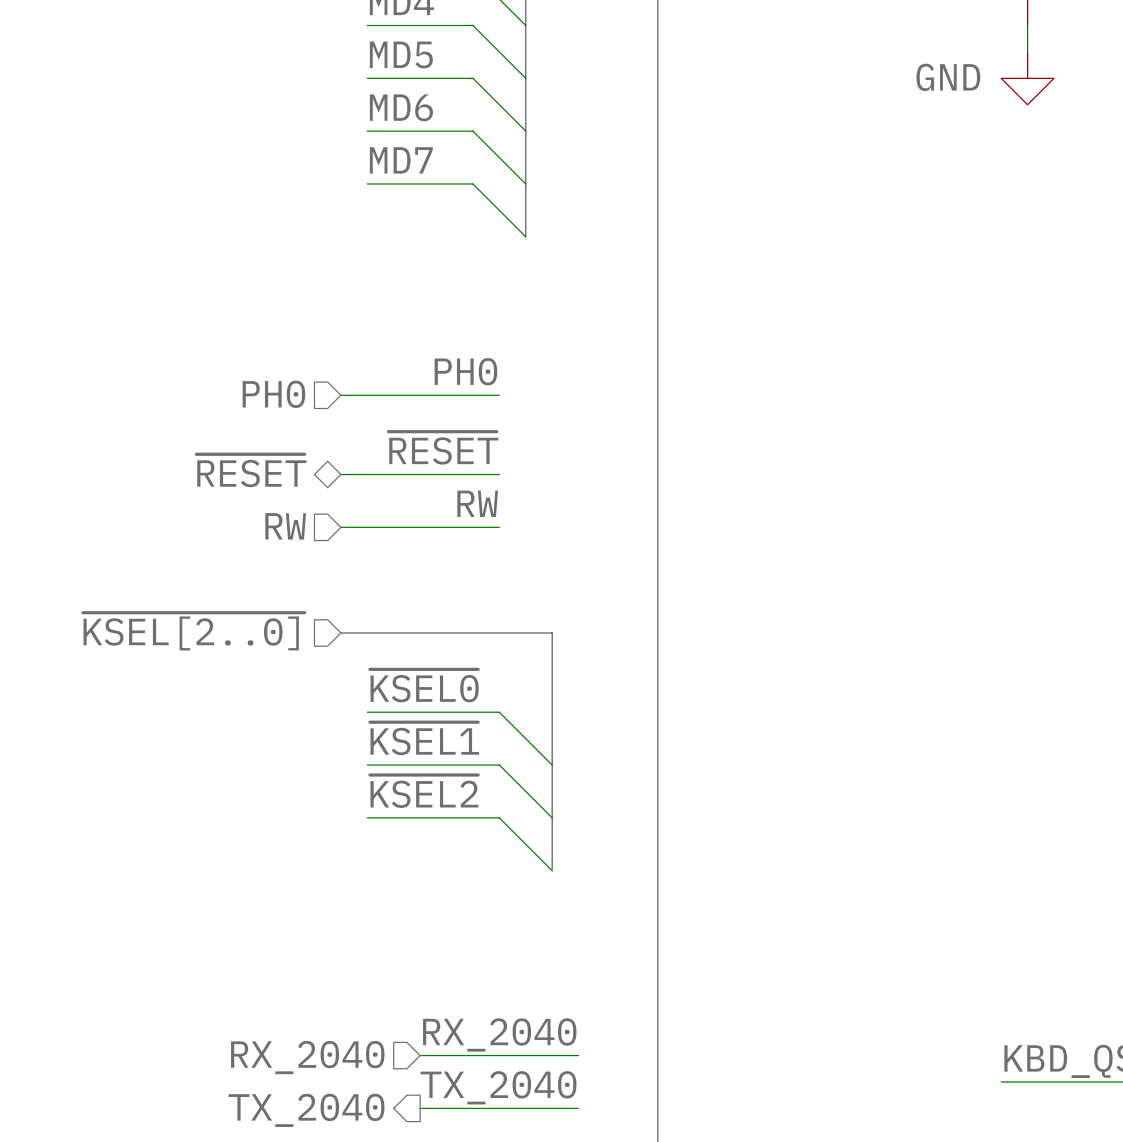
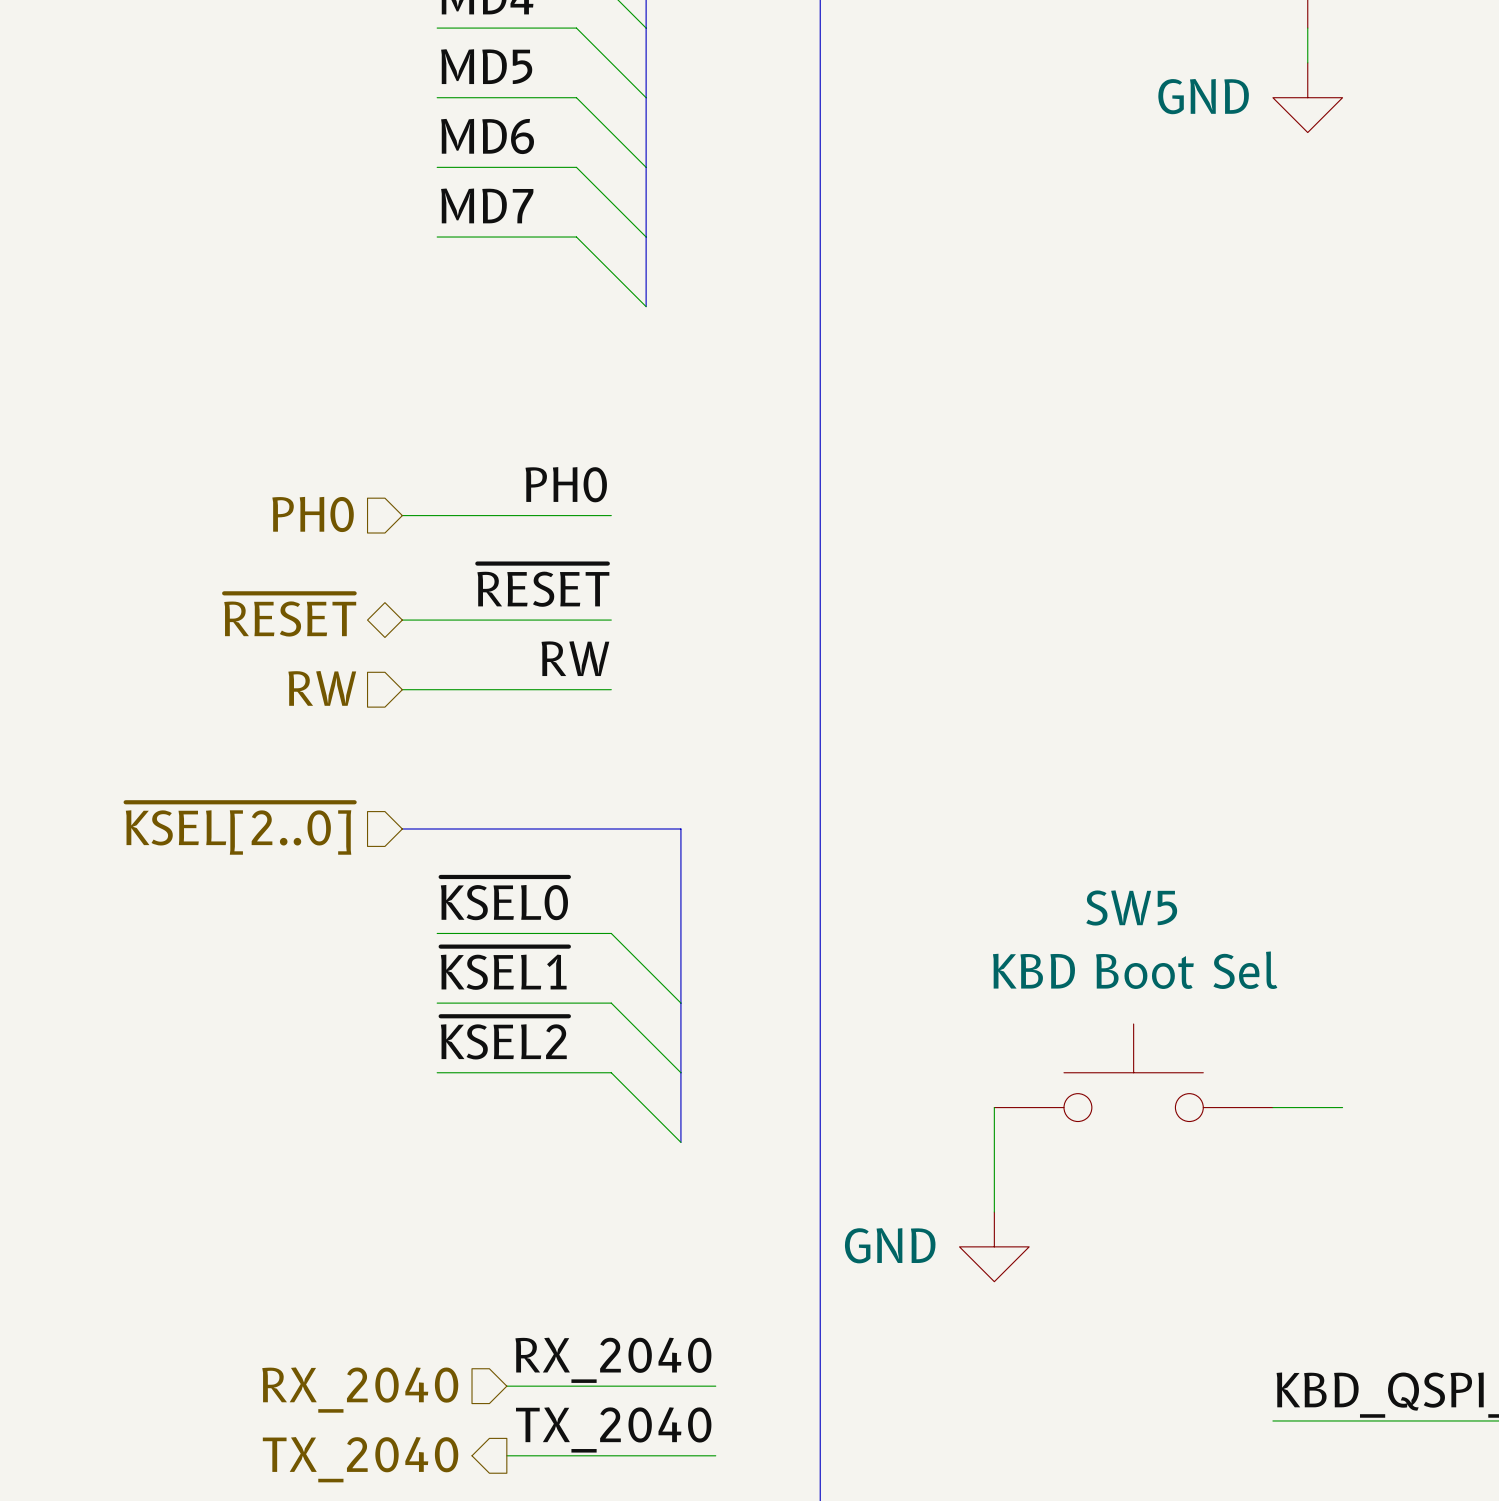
SW5: none -> KBD Boot Sel (1133, 1072)
wire: none -> (994, 1107) (994, 1212)
wire: none -> (1272, 1107) (1342, 1107)
power symbol: none -> GND (994, 1246)

